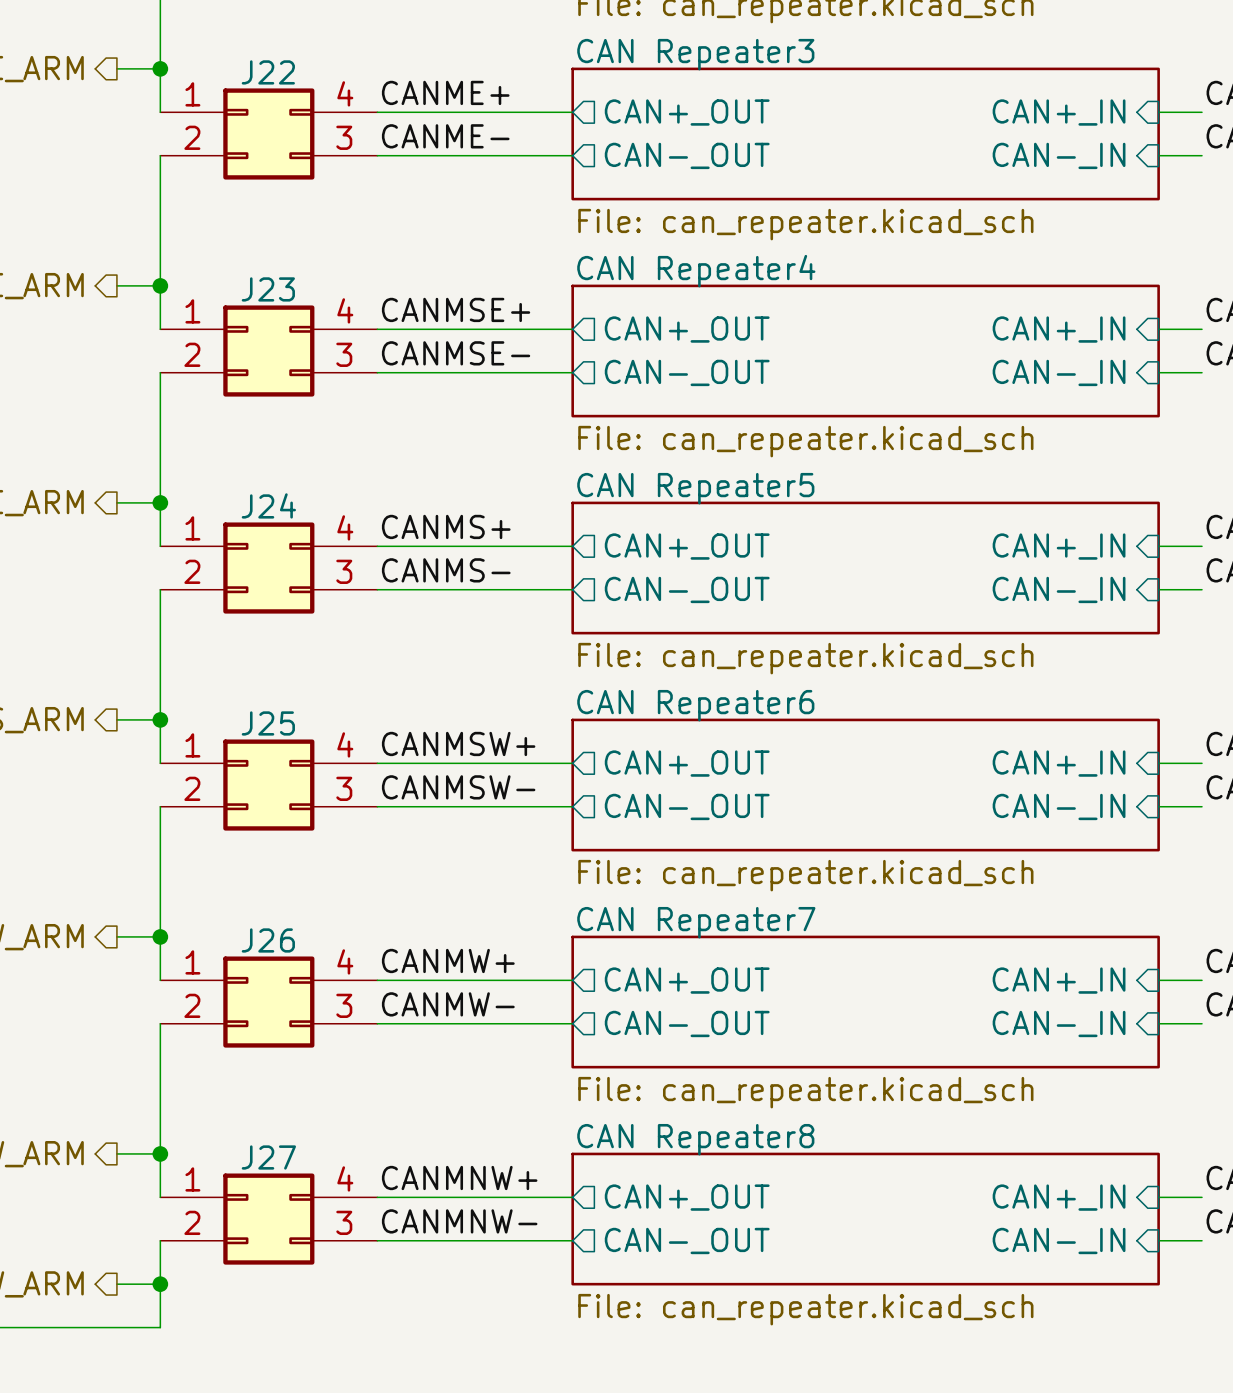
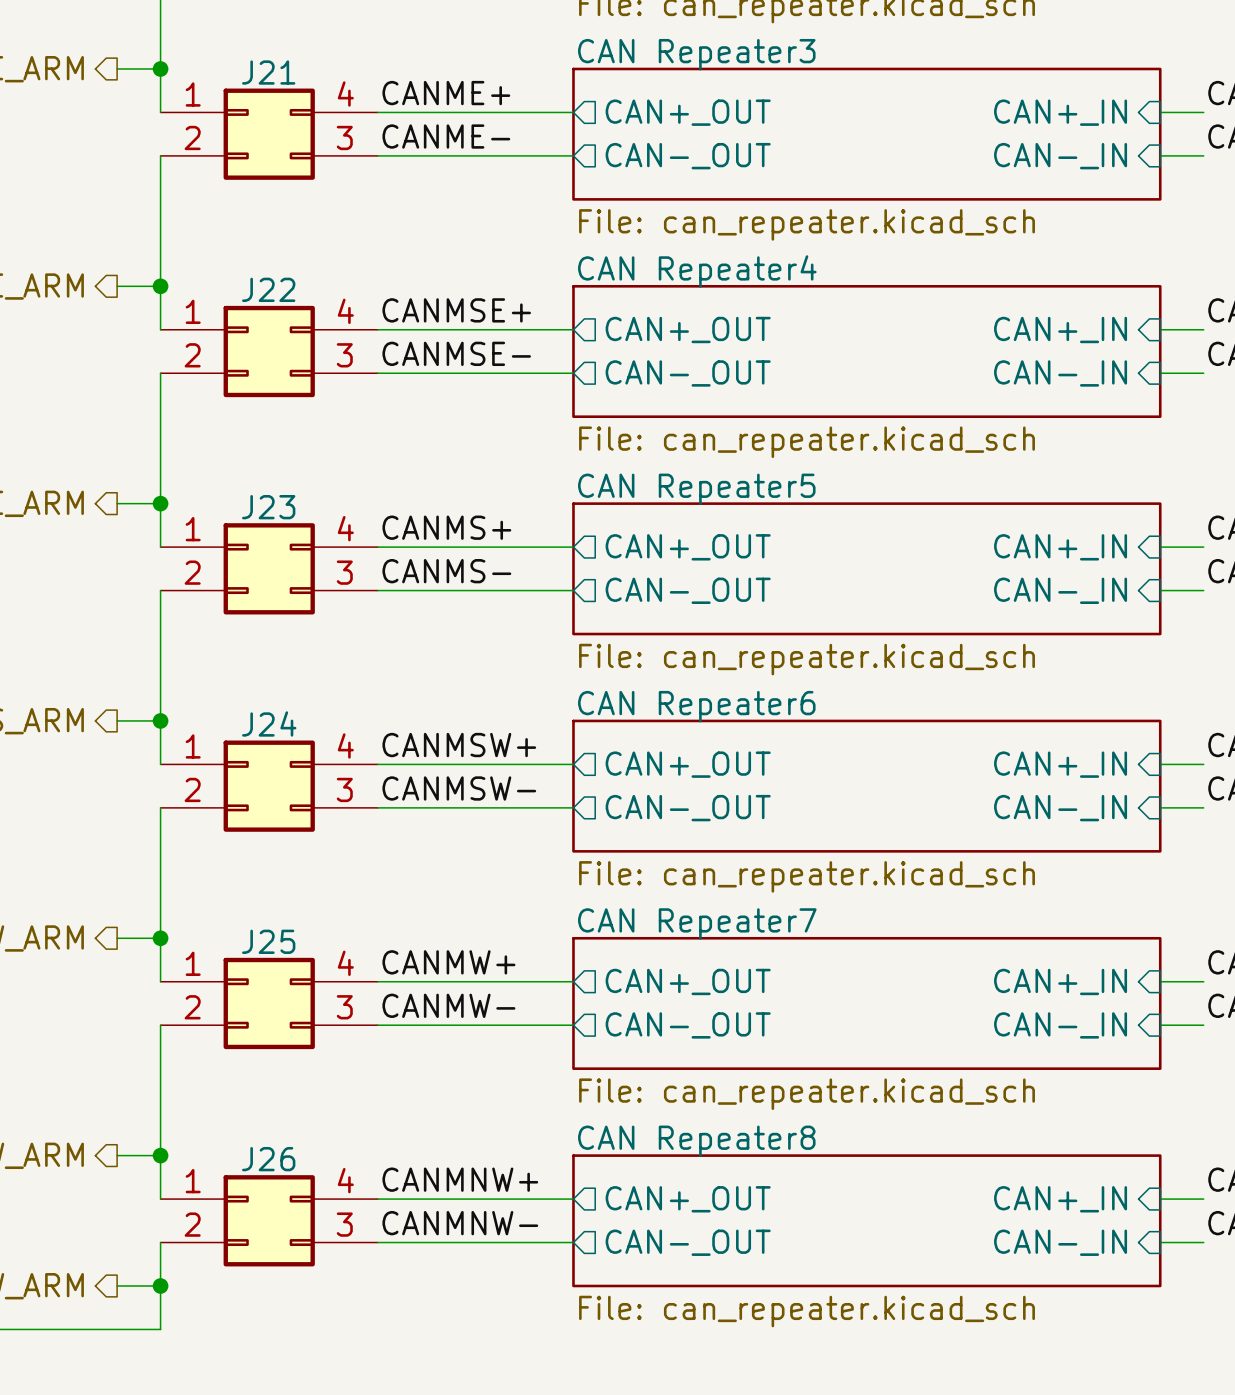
J22 name: J22 (268, 72) -> J21 (268, 72)
J23 name: J23 (268, 289) -> J22 (268, 289)
J24 name: J24 (268, 505) -> J23 (268, 507)
J25 name: J25 (268, 723) -> J24 (269, 723)
J26 name: J26 (268, 940) -> J25 (268, 941)
J27 name: J27 (268, 1157) -> J26 (268, 1159)

